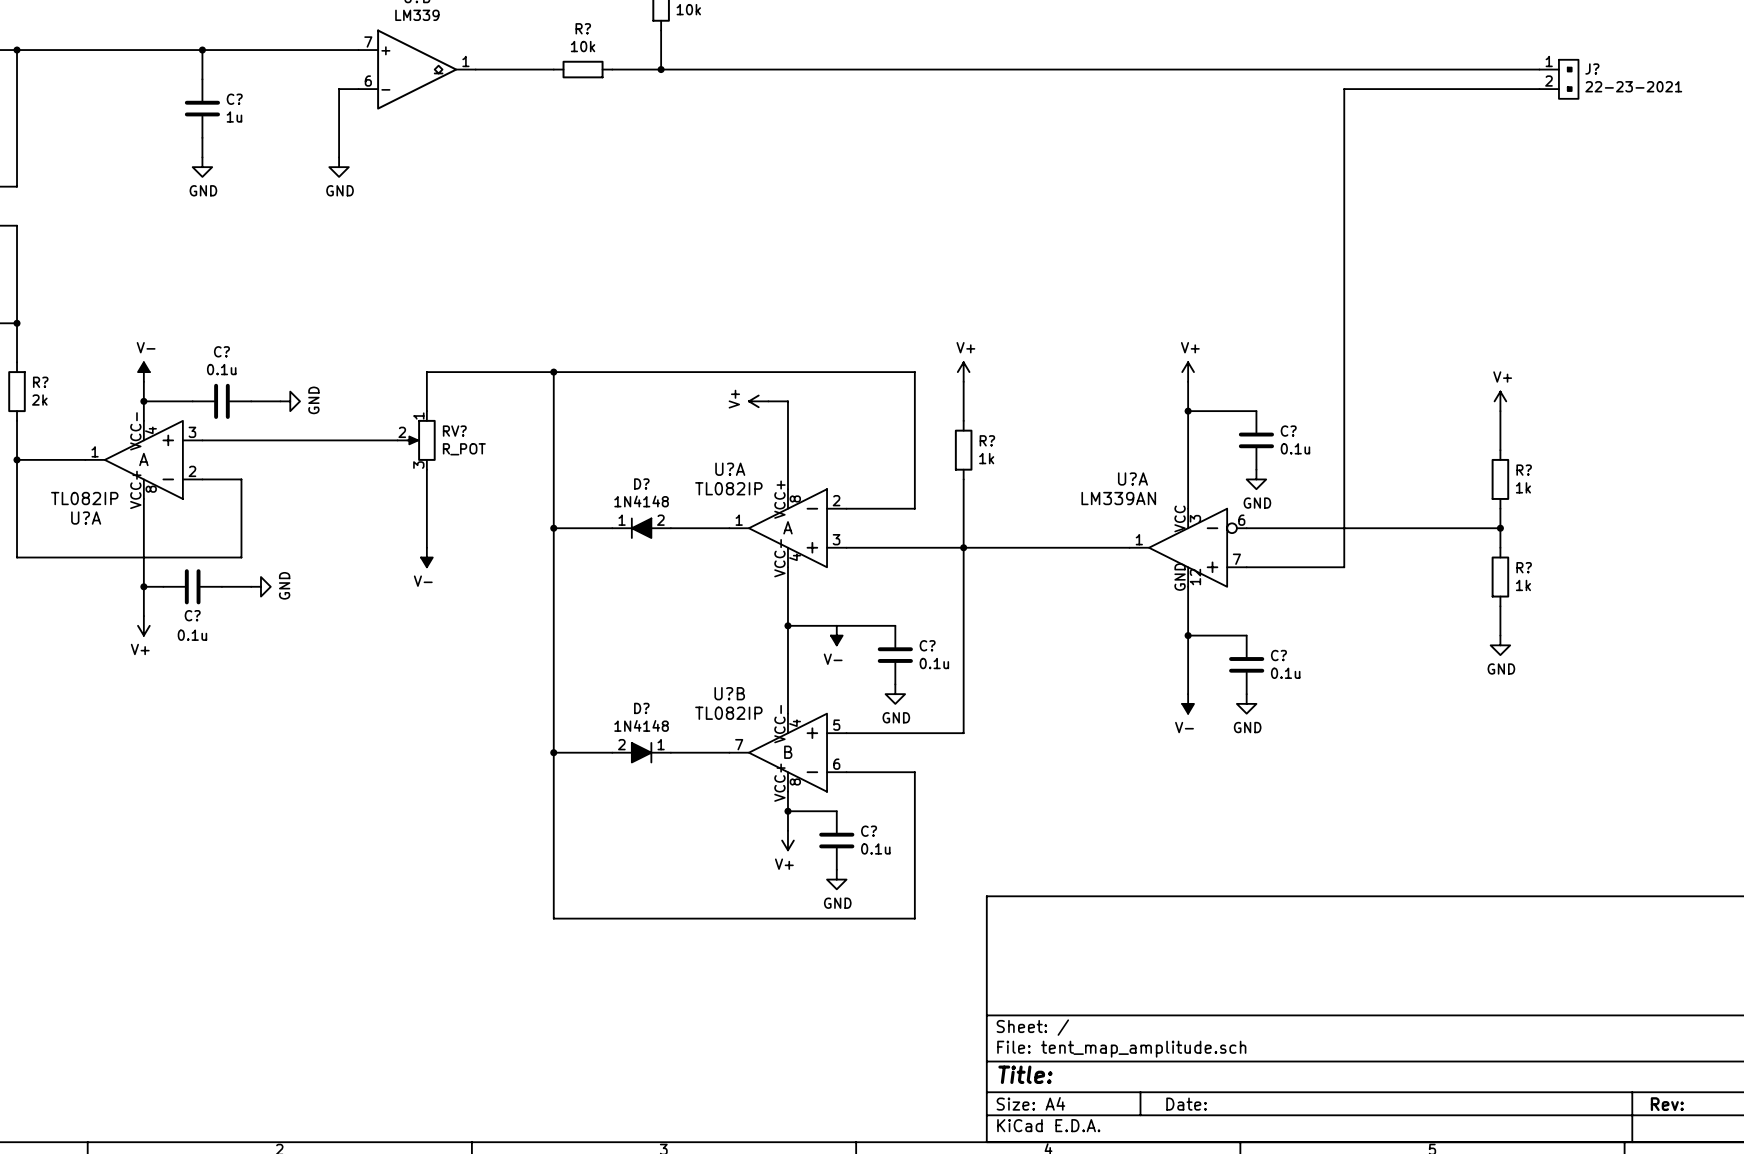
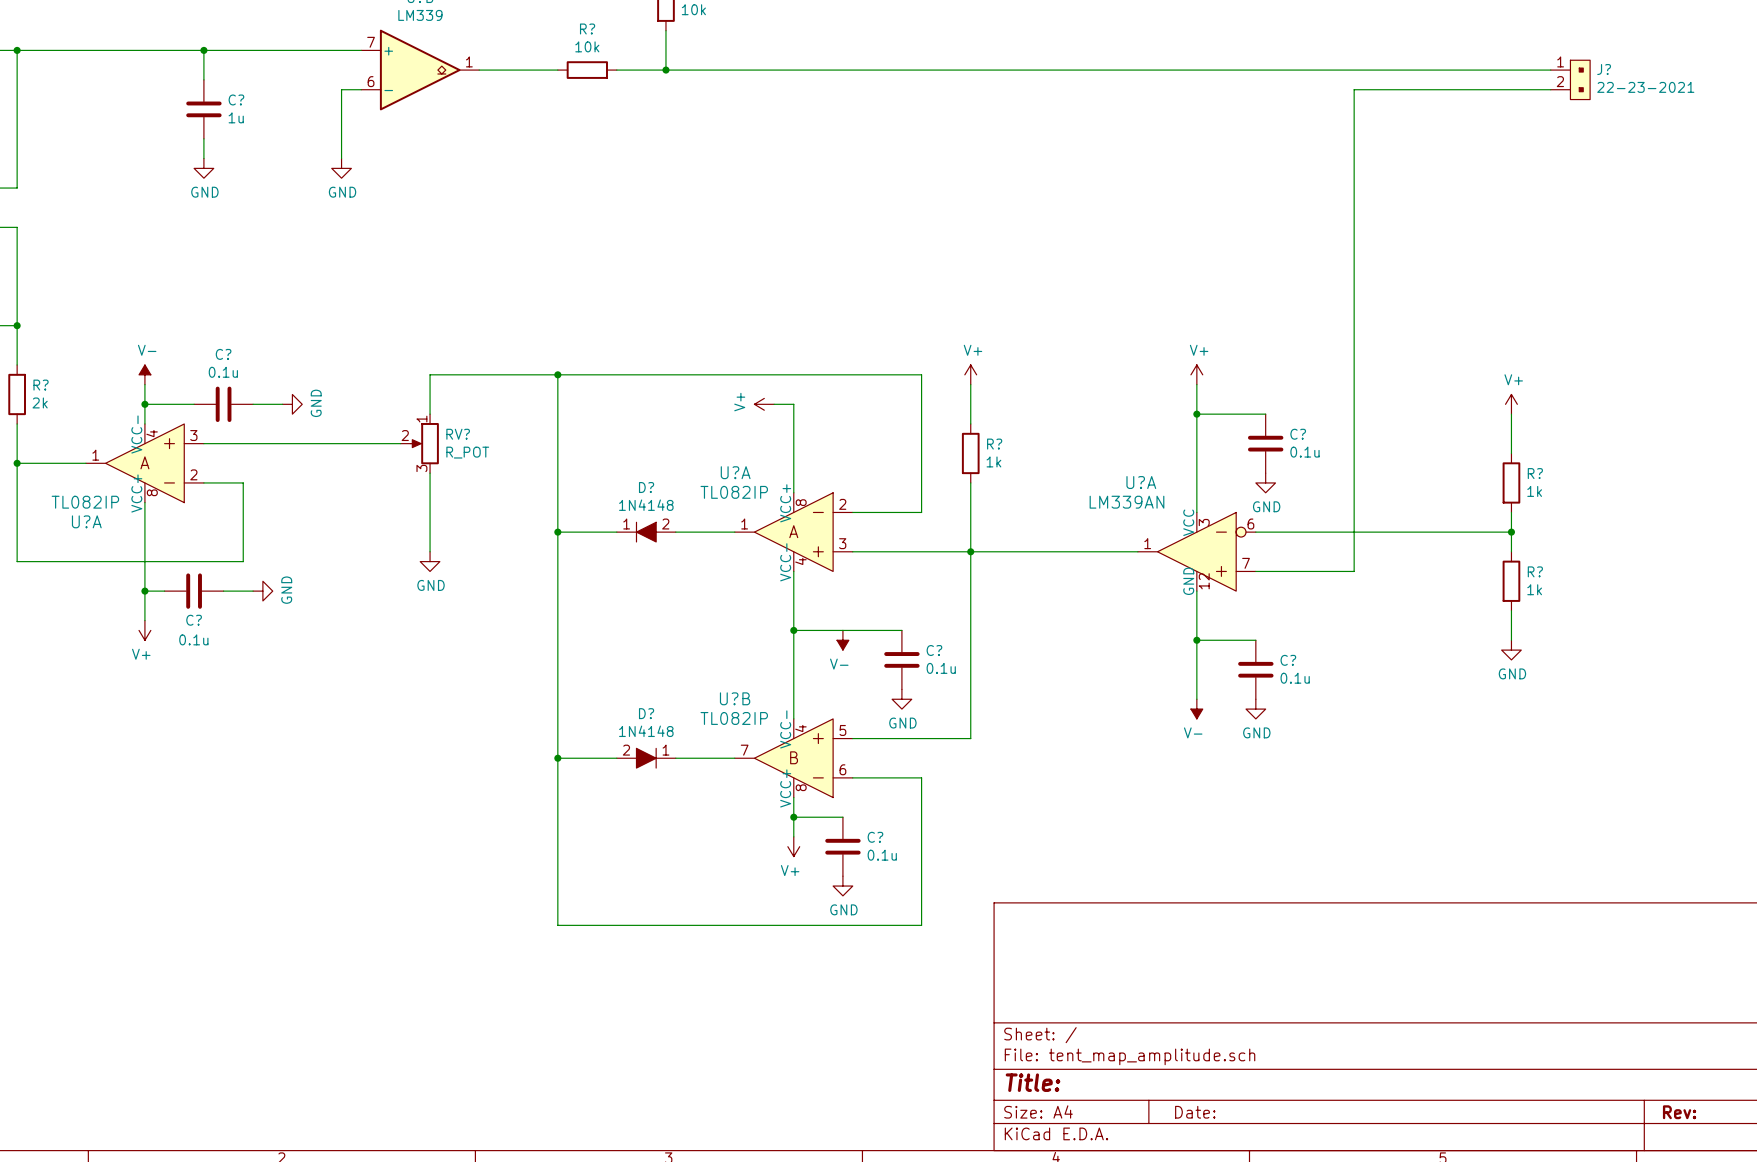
power symbol: V- (426, 557) -> GND (430, 561)

